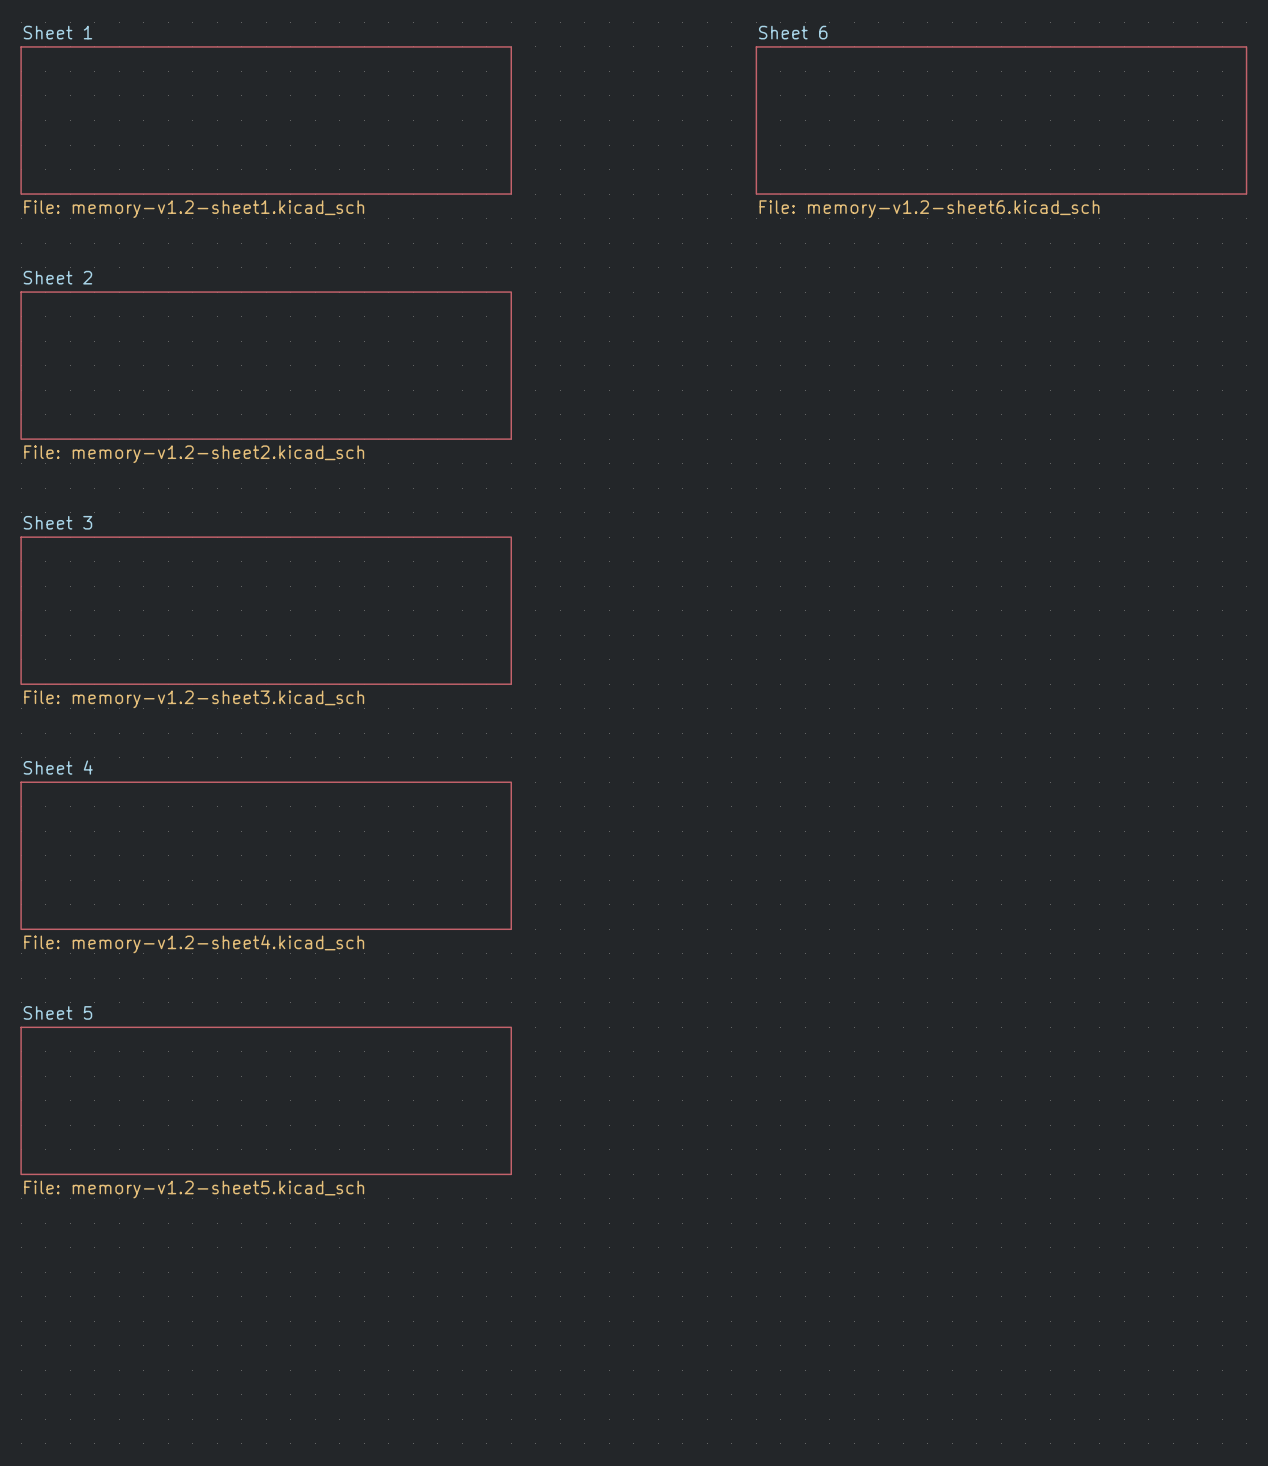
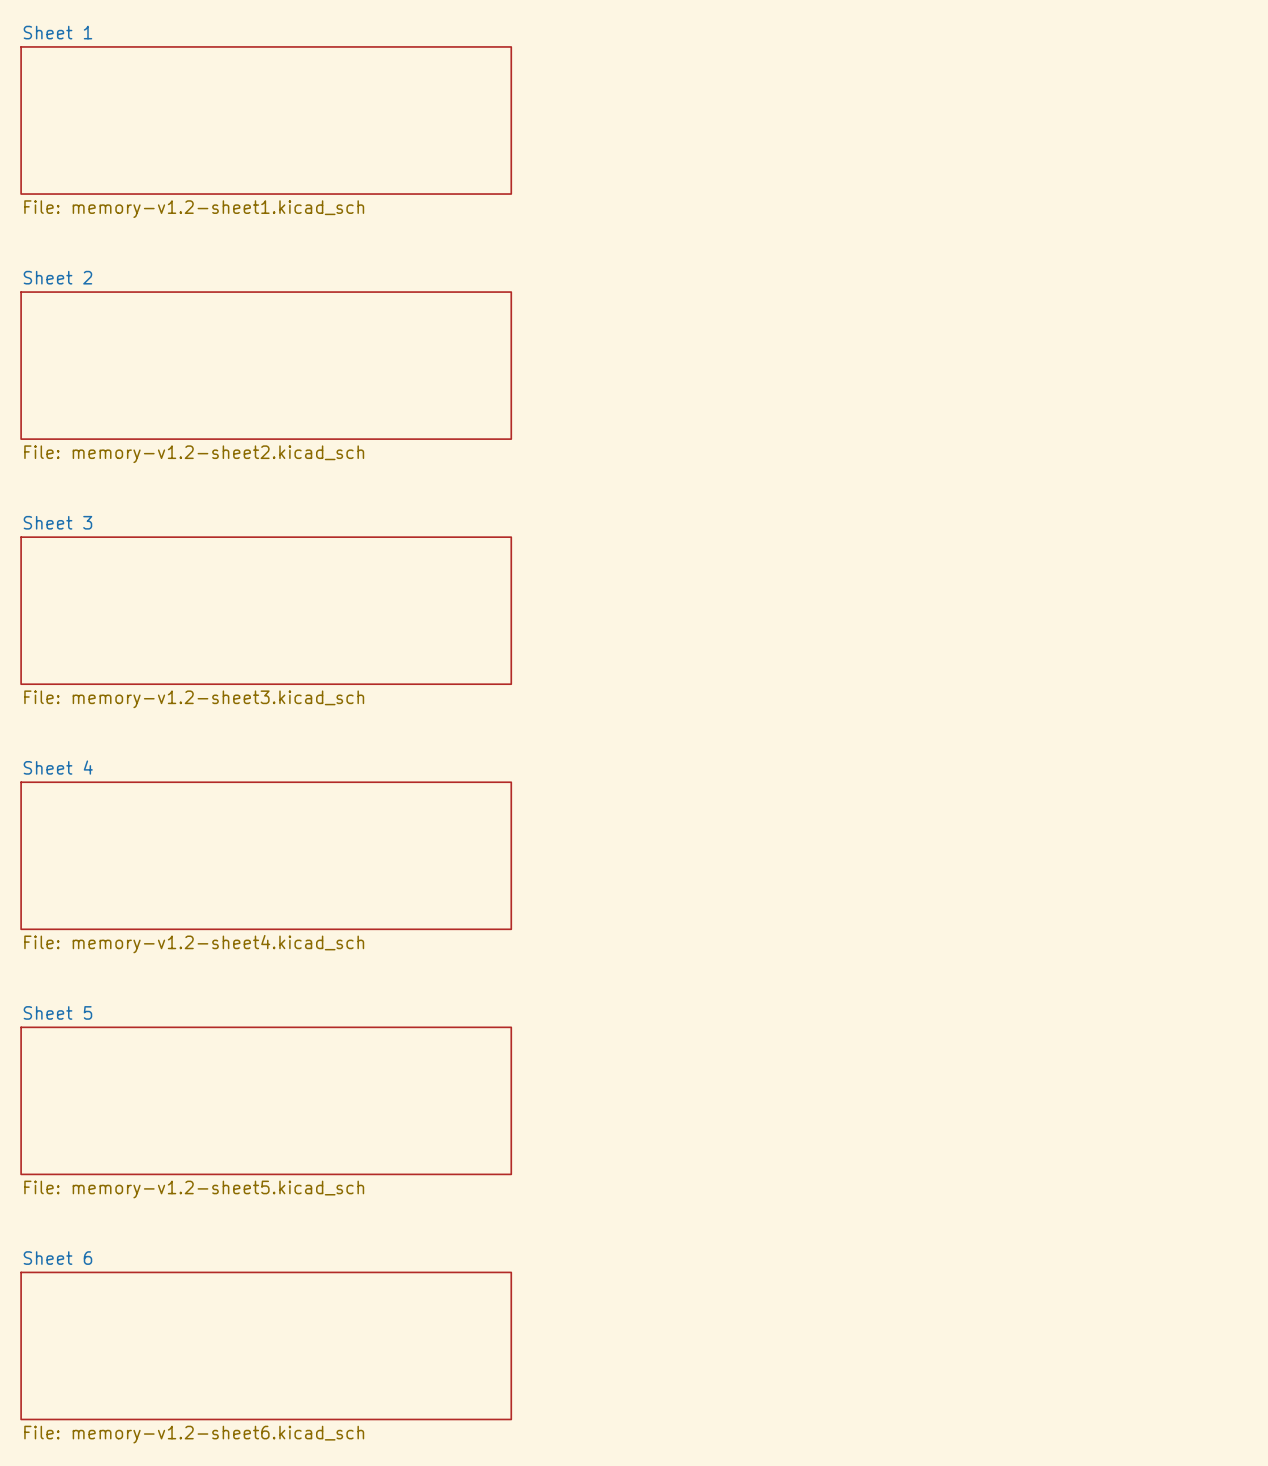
sheet Sheet 6 position: (1001, 120) -> (266, 1345)

